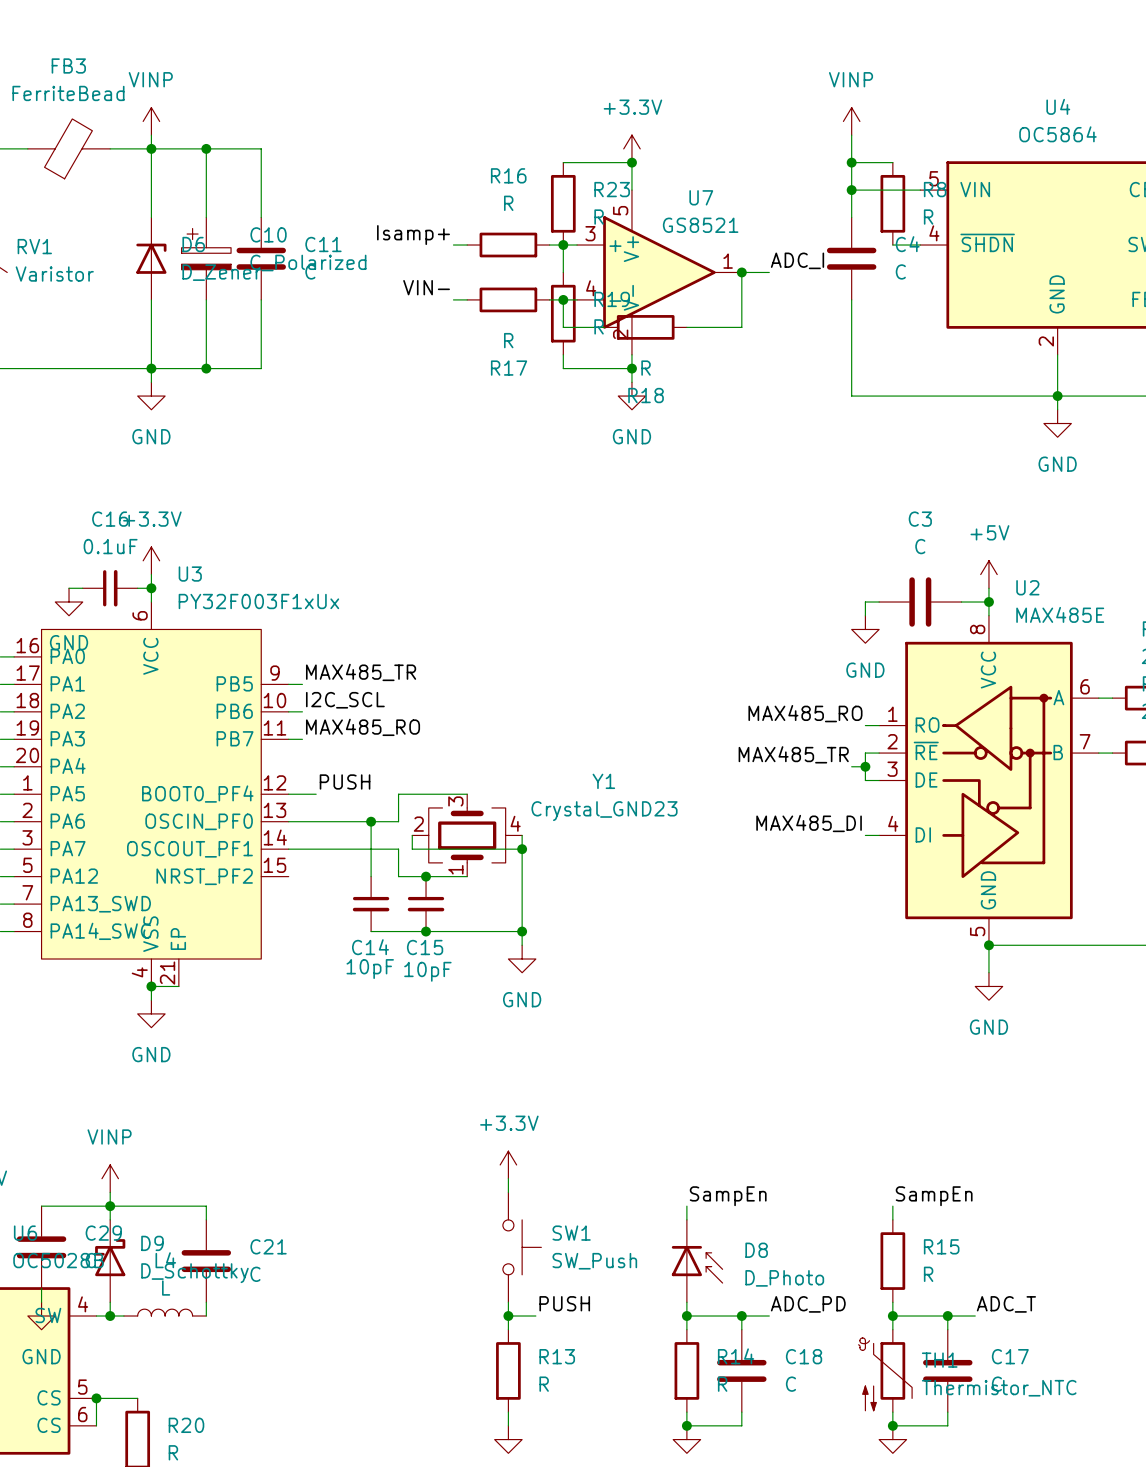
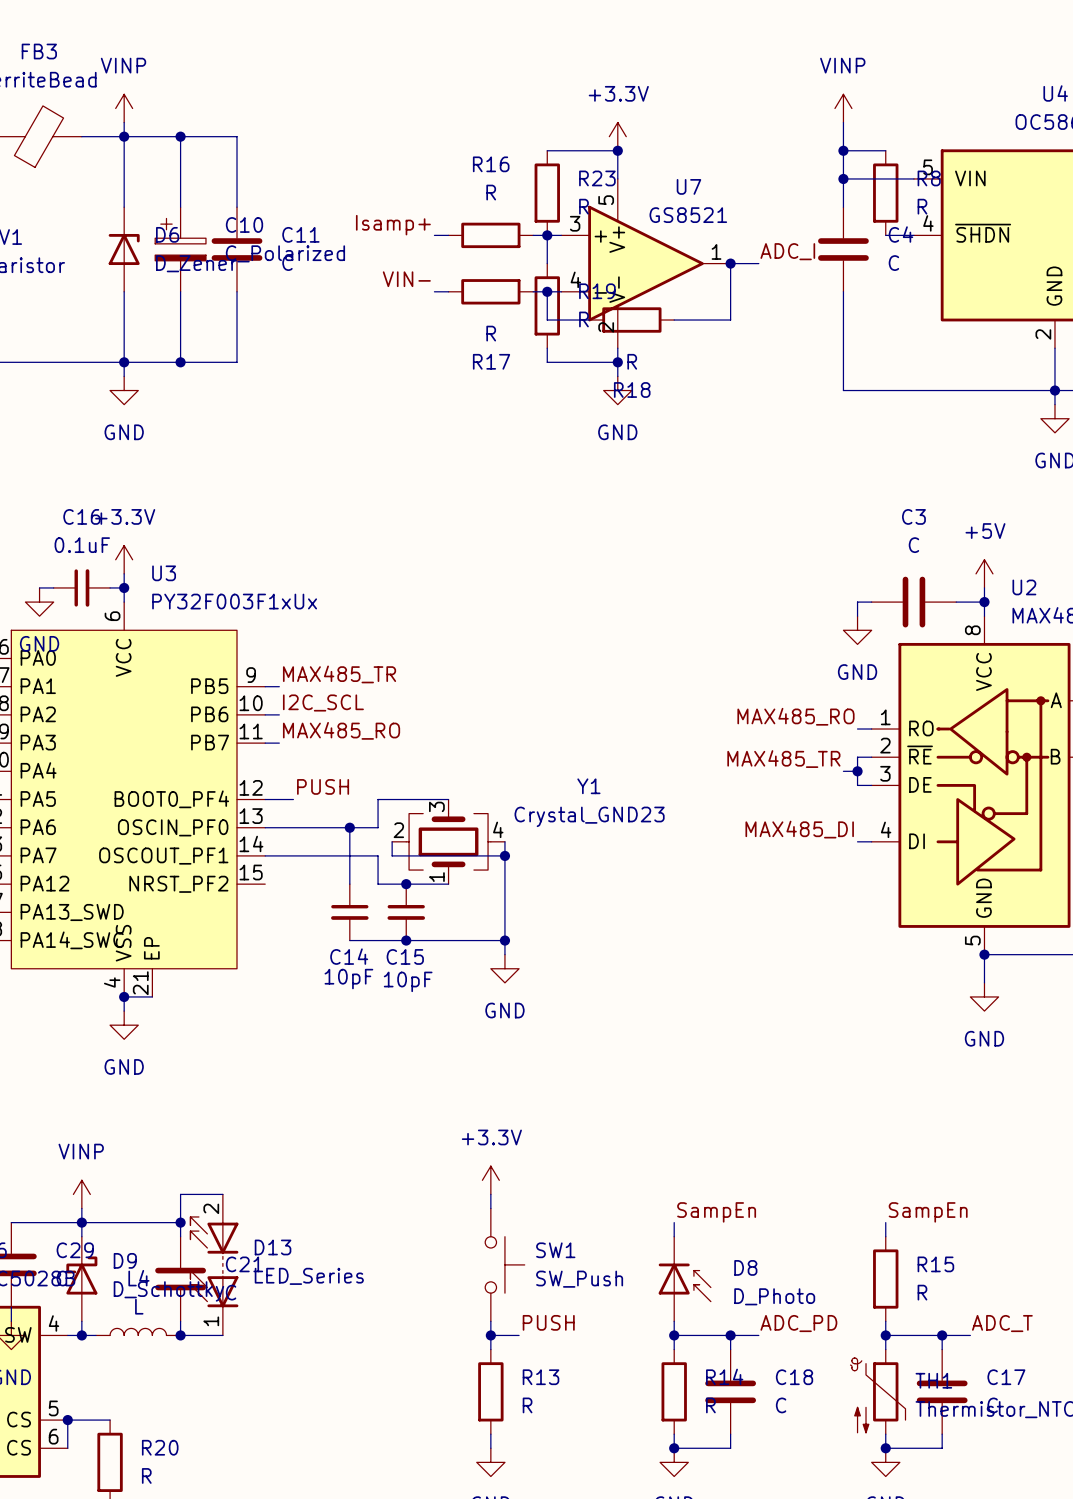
wire: none -> (222, 1194) (180, 1194) (180, 1222)
junction: none -> (180, 1222)
D13: none -> LED_Series (214, 1264)
wire: none -> (180, 1335) (222, 1335)
junction: none -> (180, 1335)

